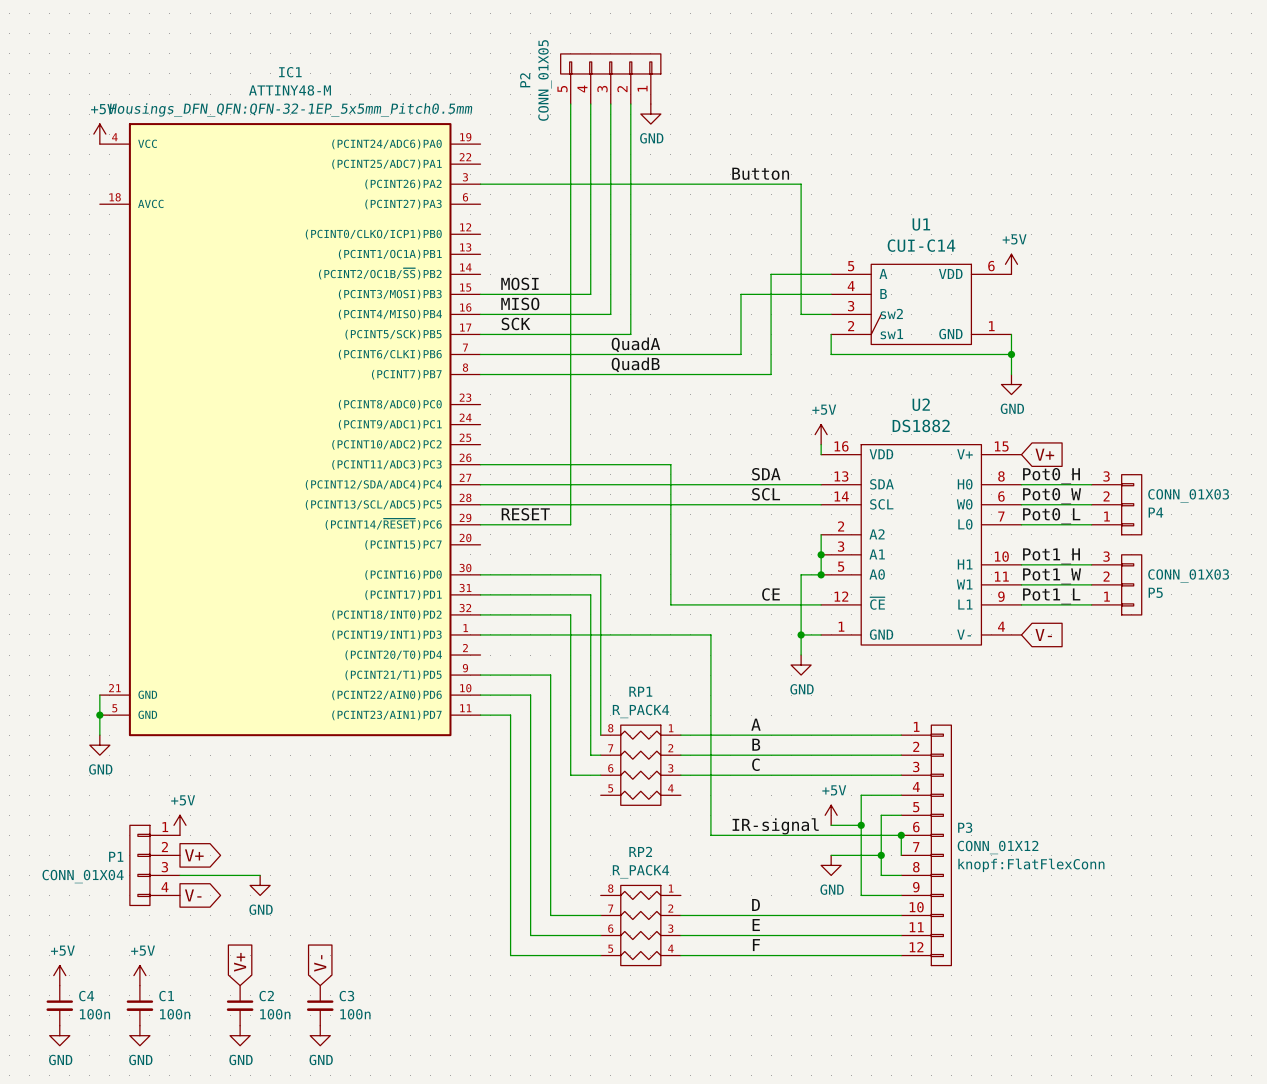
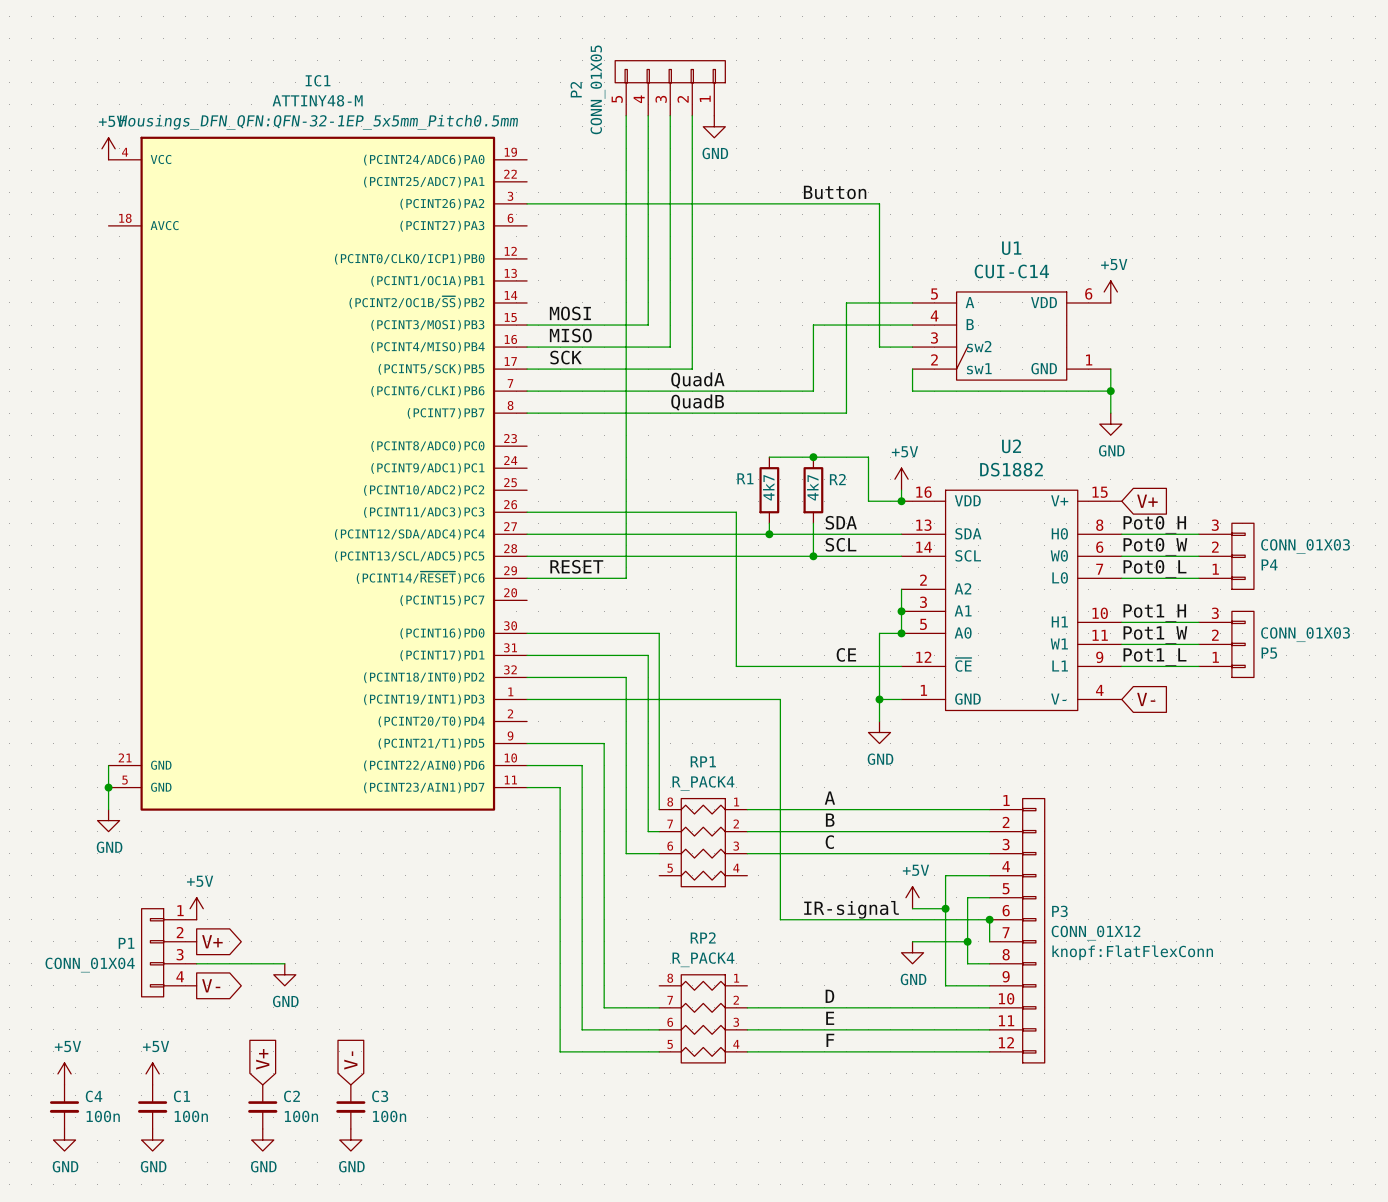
wire: none -> (769, 457) (868, 457) (868, 501) (901, 501)
junction: none -> (813, 457)
R1: none -> 4k7 (769, 490)
R2: none -> 4k7 (813, 490)
junction: none -> (901, 501)
wire: none -> (769, 523) (769, 534)
wire: none -> (813, 523) (813, 556)
junction: none -> (769, 534)
junction: none -> (813, 556)

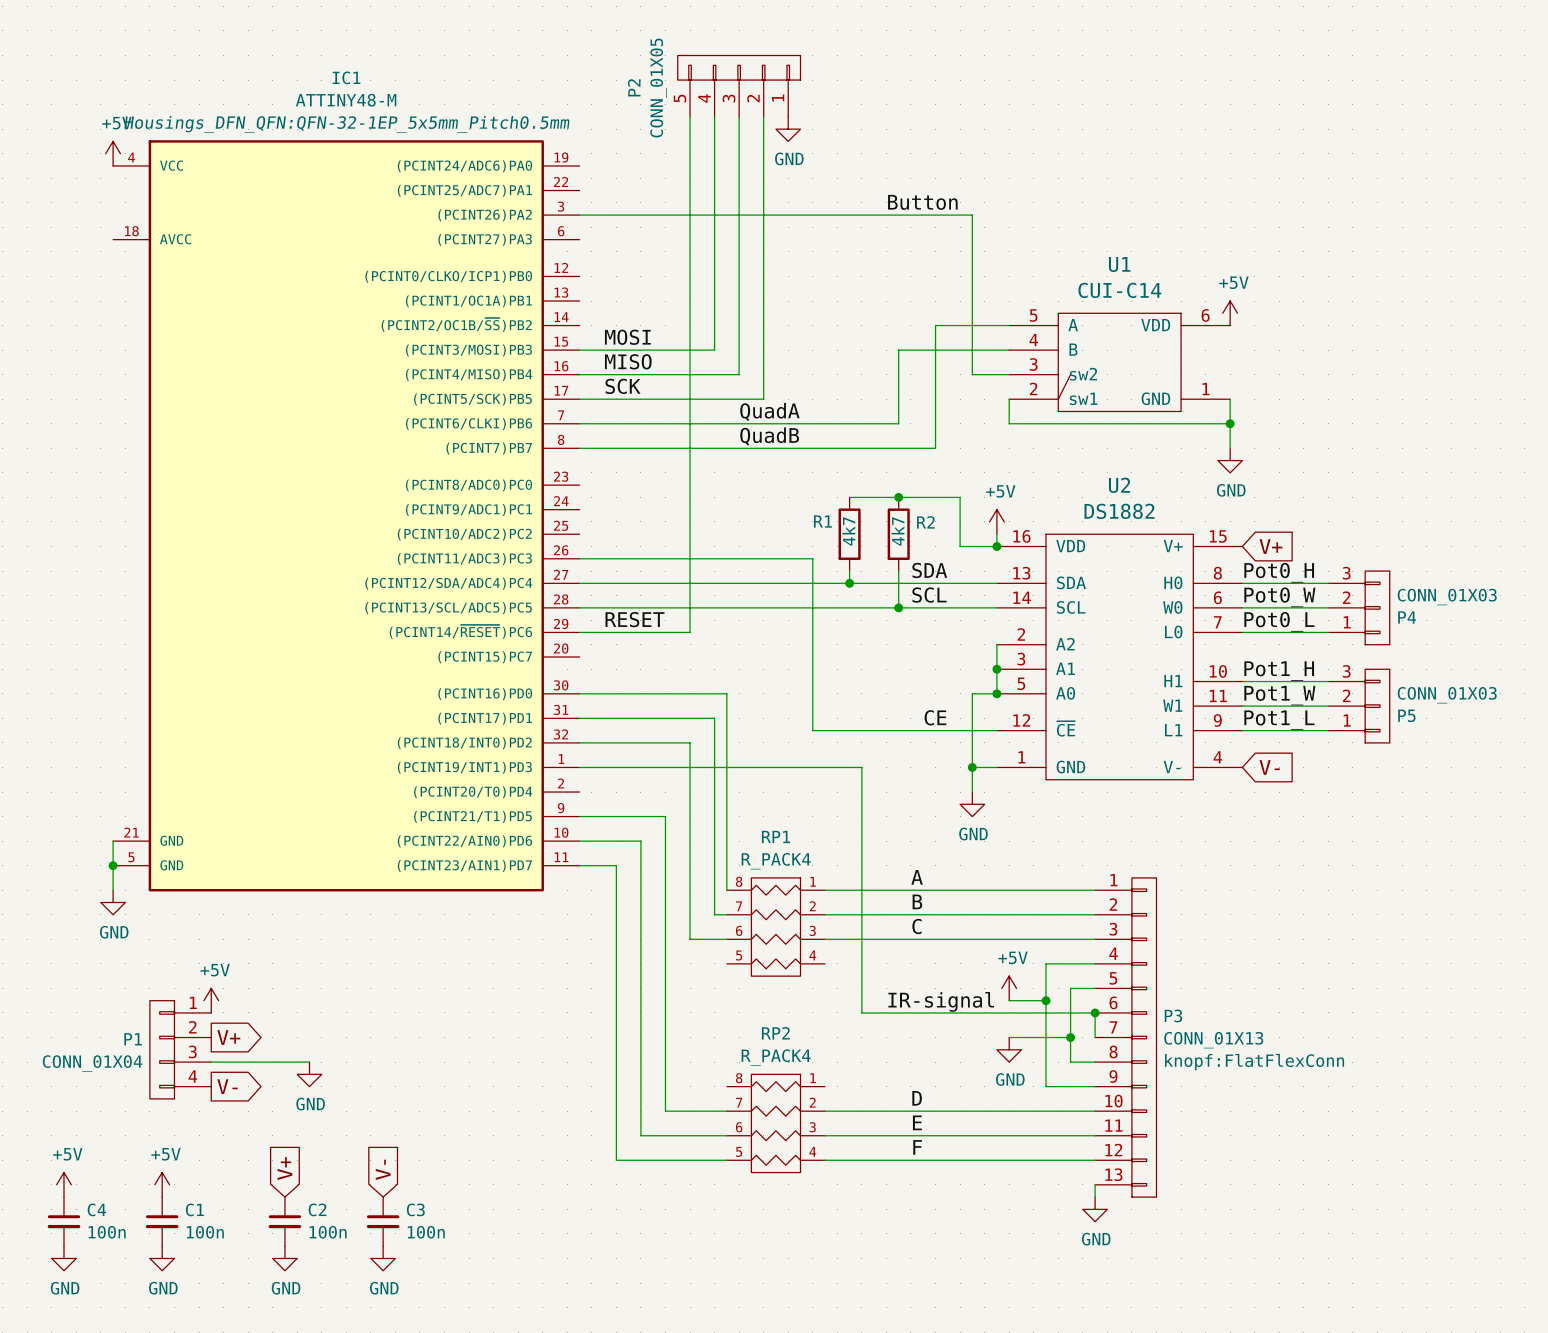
P3 symbol: [989, 798, 1045, 1063] -> [1095, 877, 1157, 1198]
P3 value: CONN_01X12 (1095, 933) -> CONN_01X13 (1213, 1040)
wire: none -> (1095, 1184) (1095, 1197)
power symbol: none -> GND (1095, 1209)

